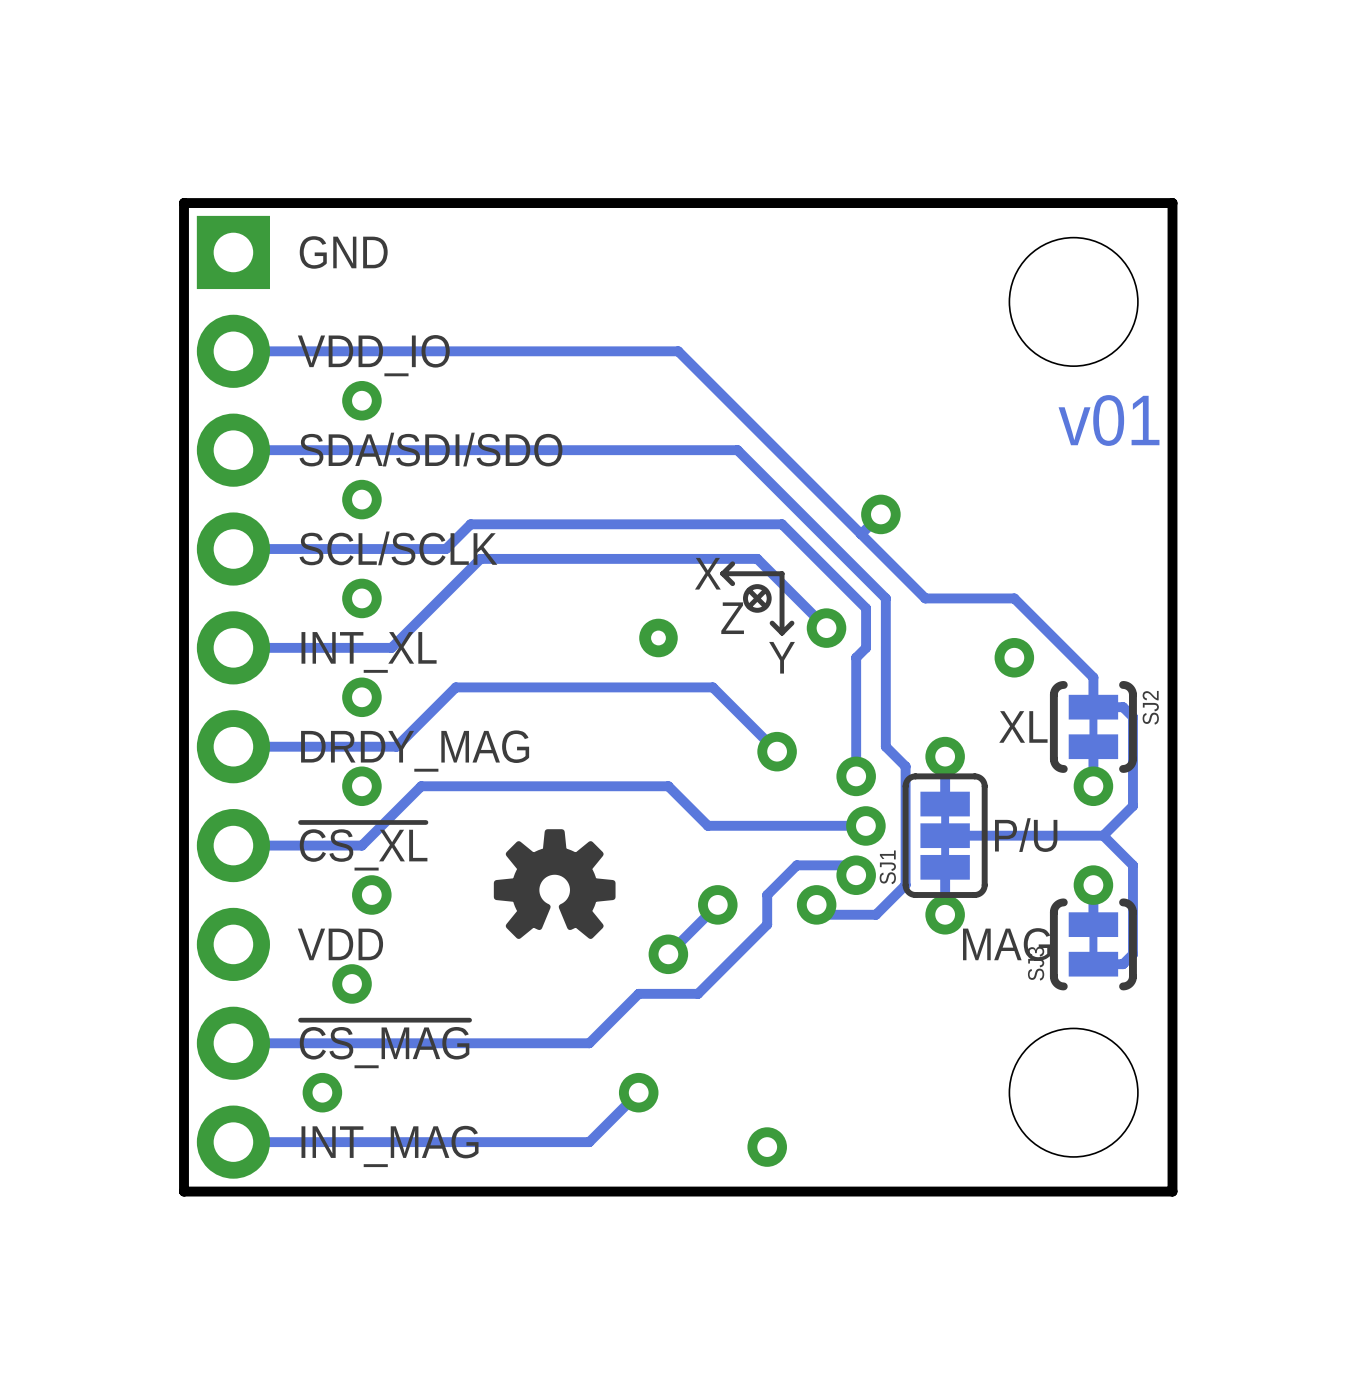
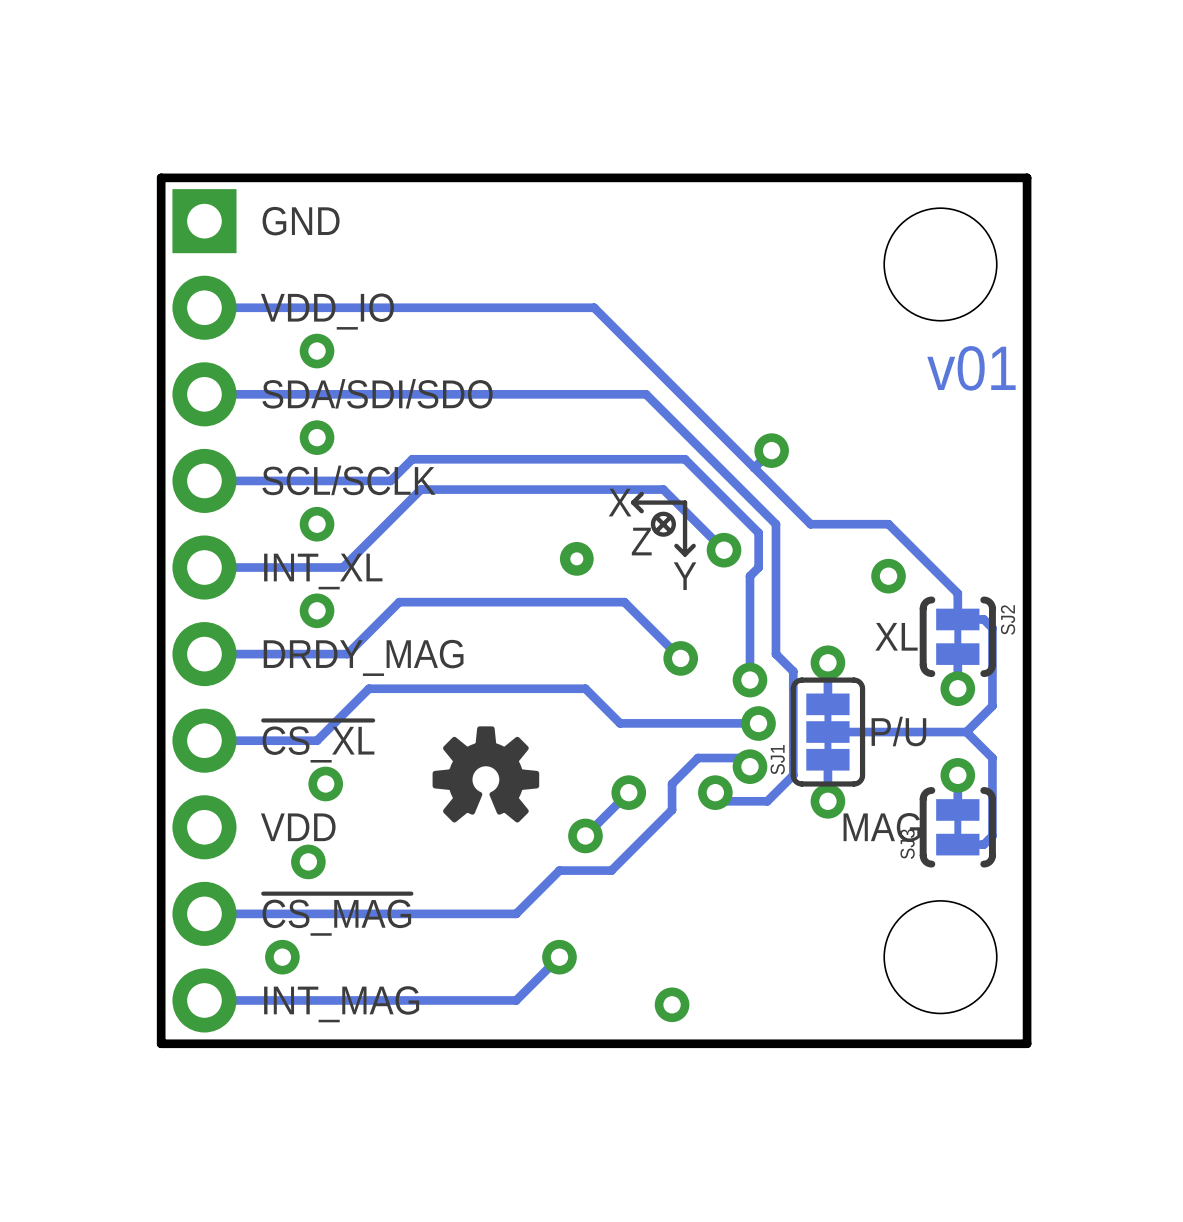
via: (361, 786) -> none

